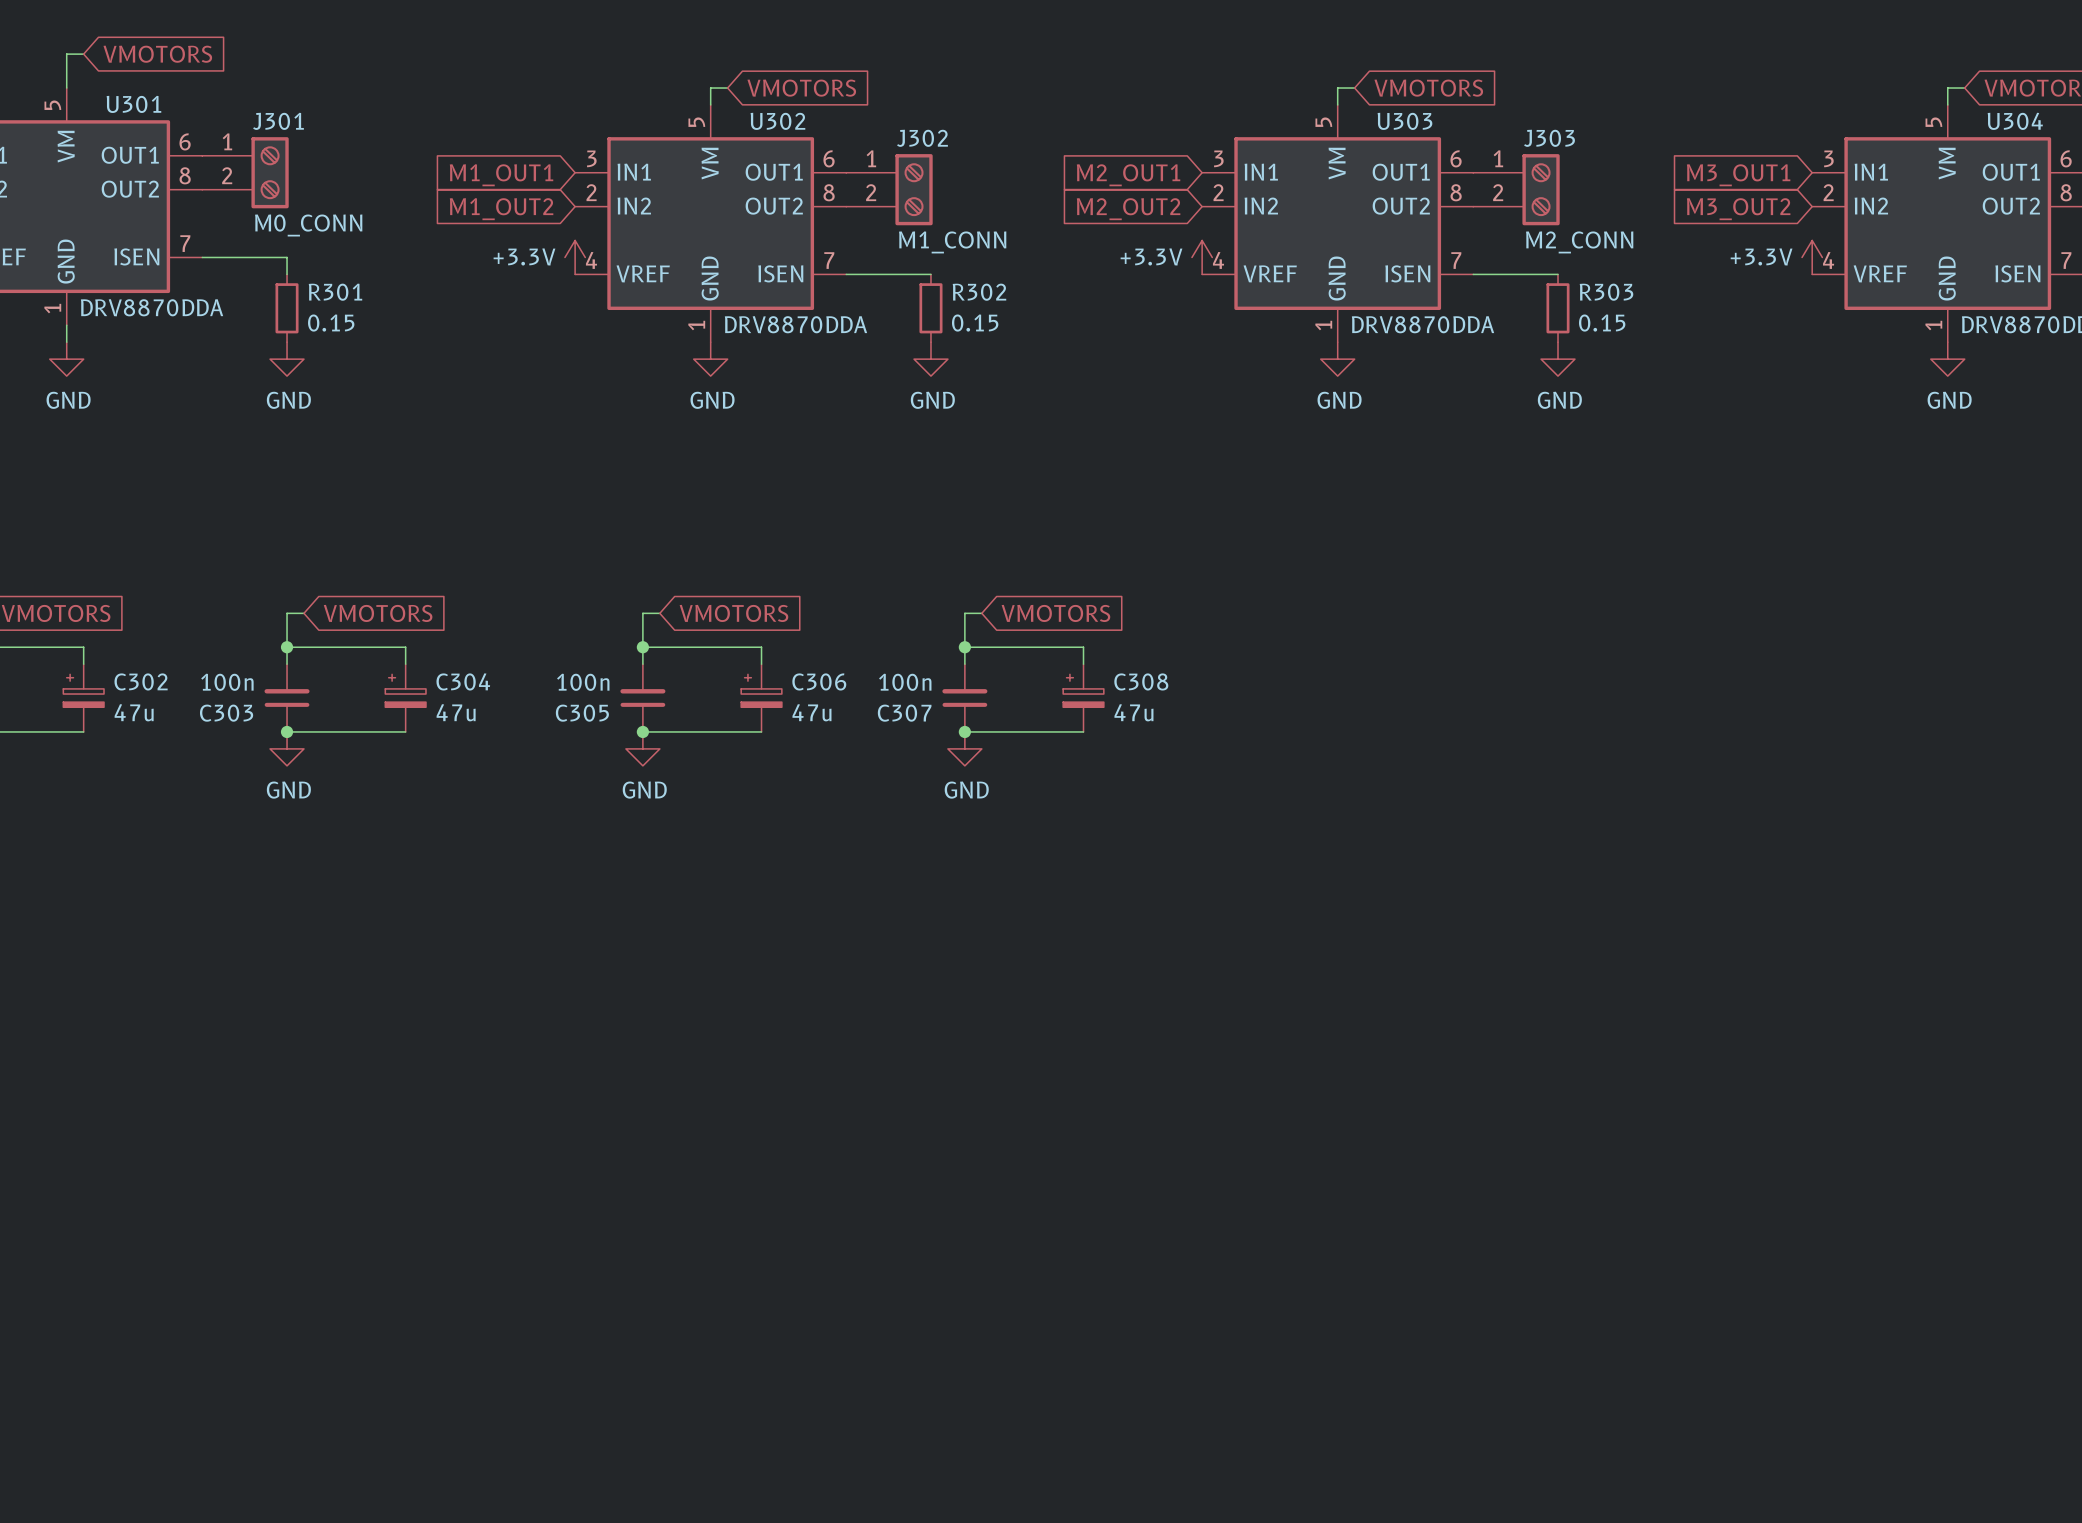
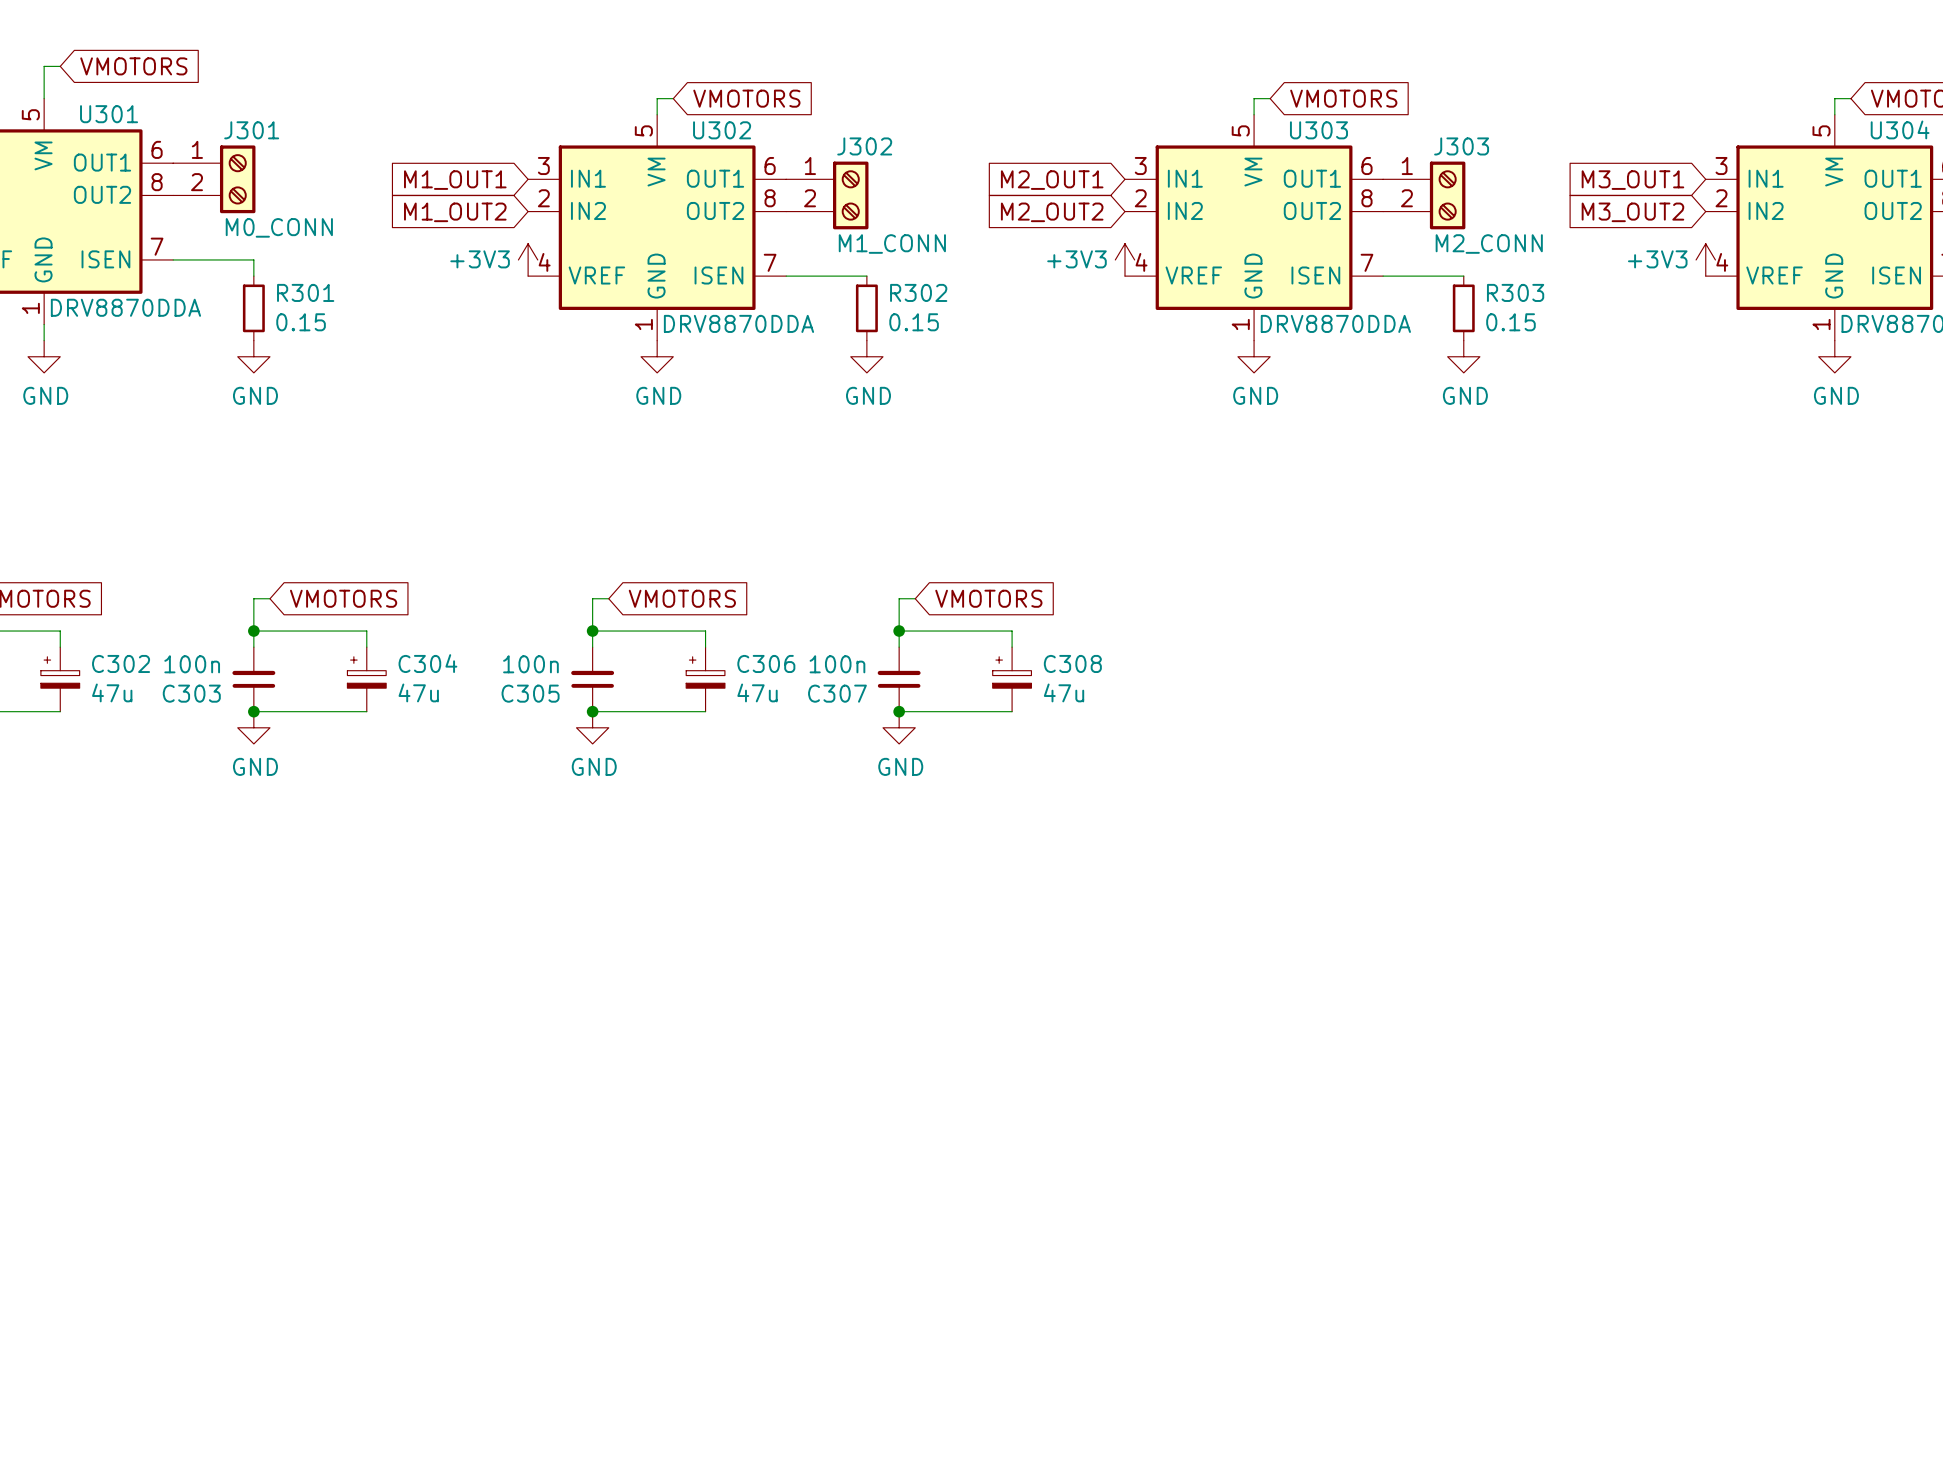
power symbol: +3.3V (575, 257) -> +3V3 (528, 259)
power symbol: +3.3V (1202, 257) -> +3V3 (1125, 259)
power symbol: +3.3V (1812, 257) -> +3V3 (1705, 259)

